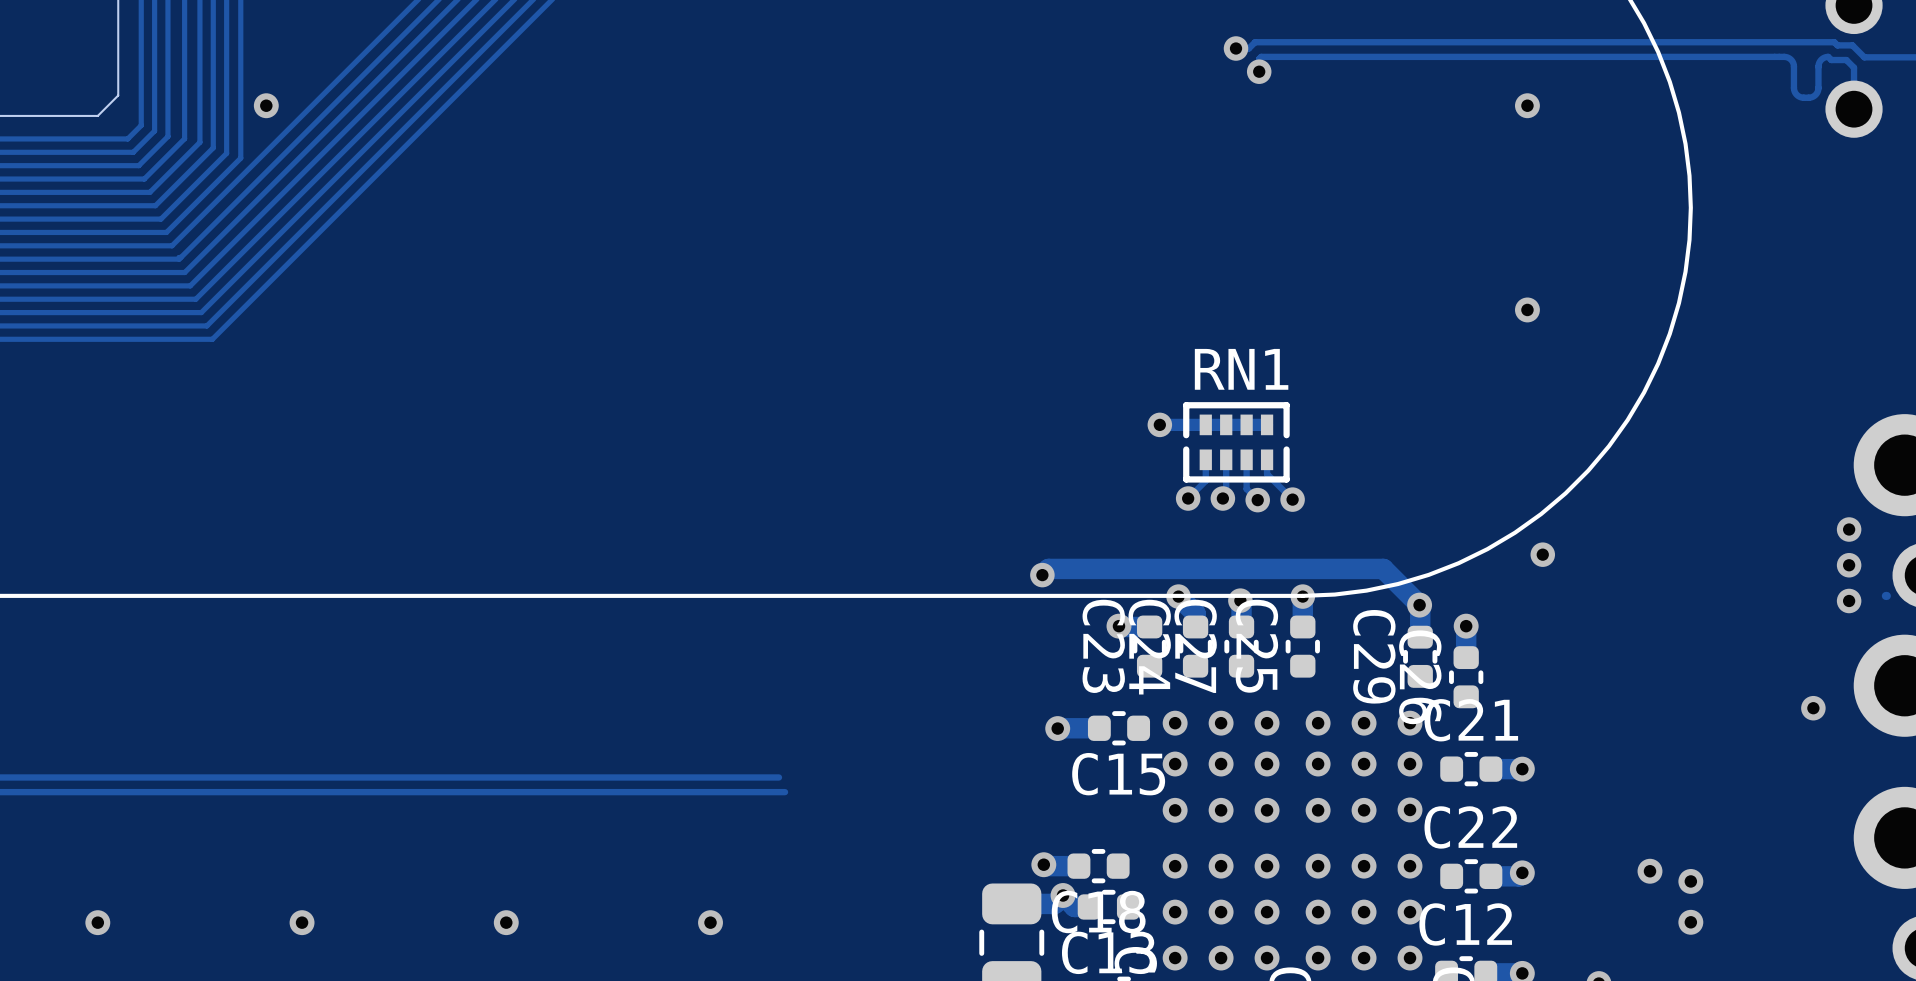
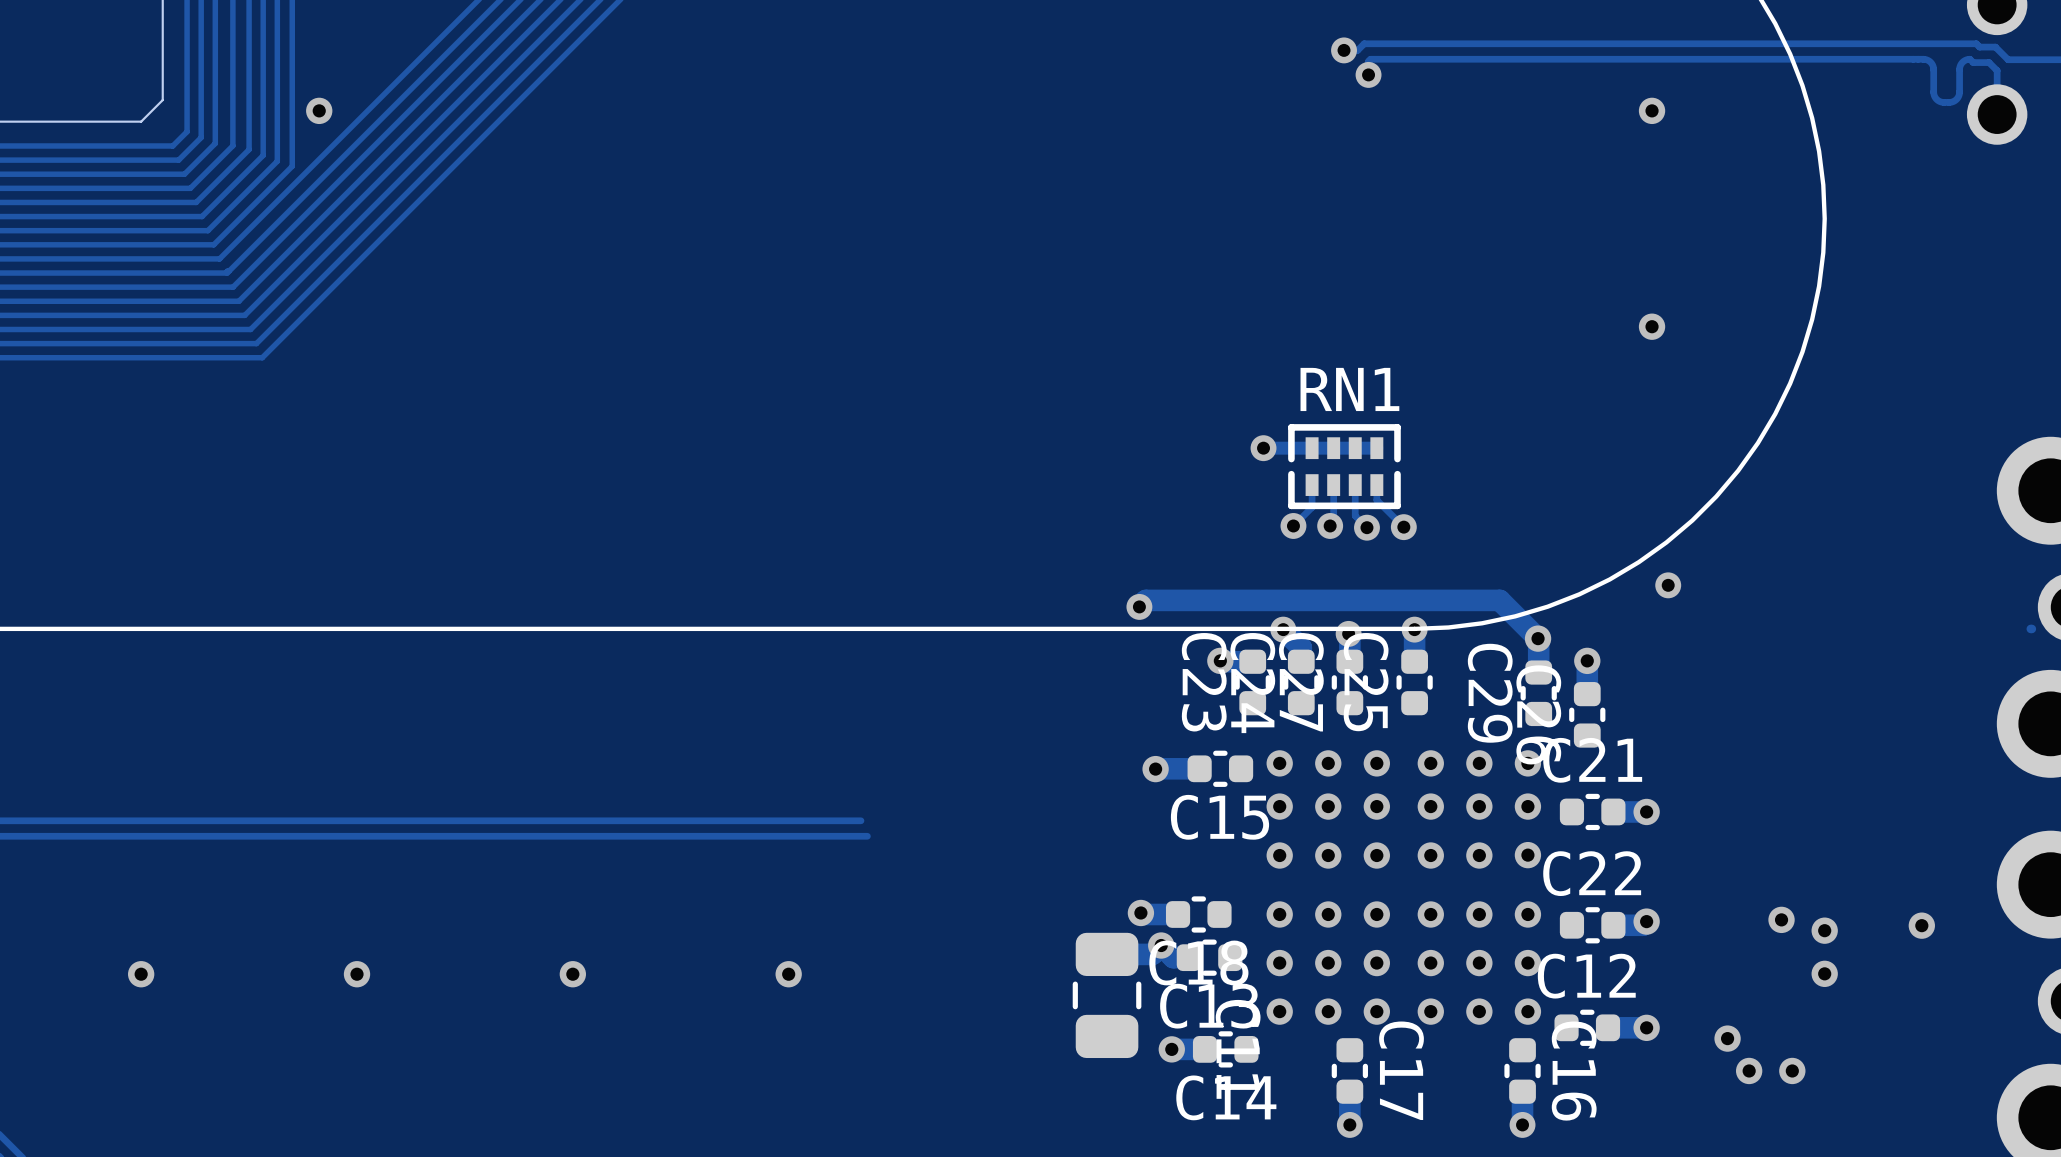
via: (1849, 529) -> none
via: (1849, 565) -> none
via: (1849, 600) -> none
via: (1813, 708) -> none
via: none -> (1921, 925)

